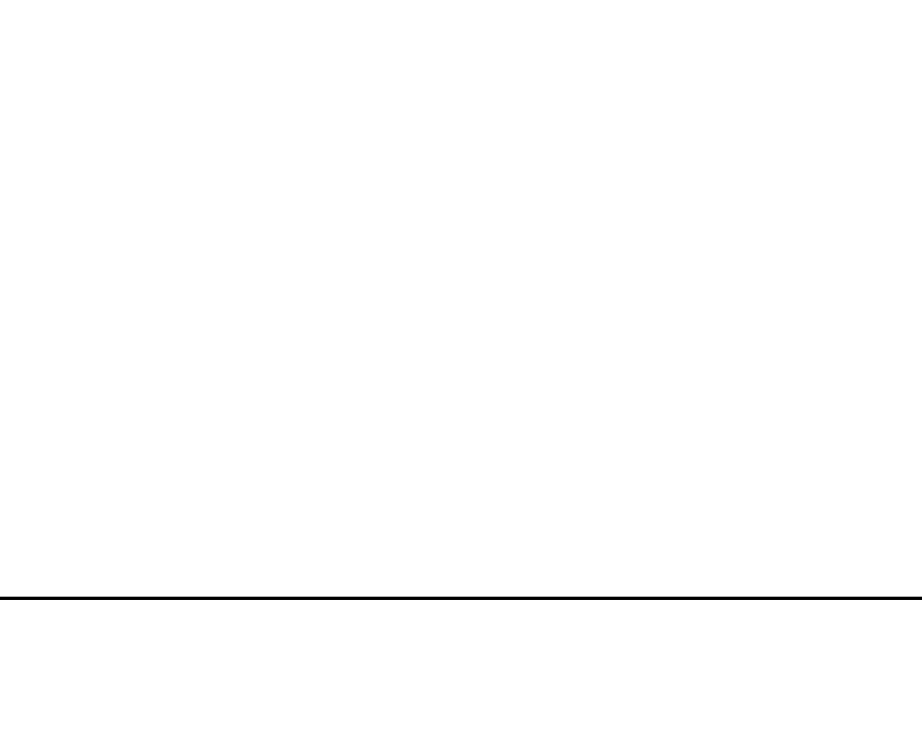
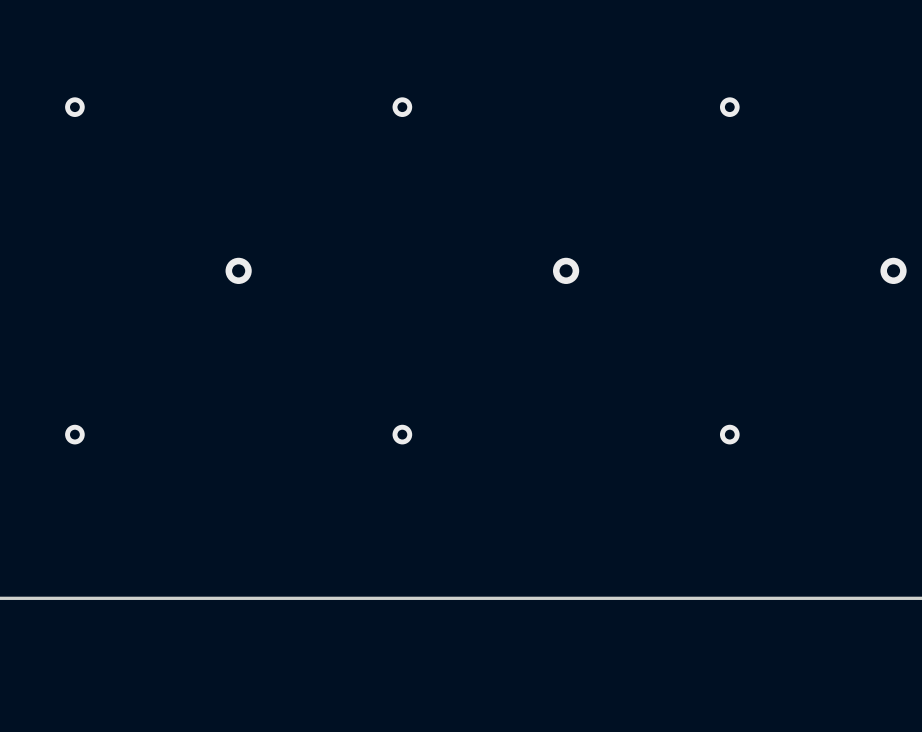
via: none -> (74, 107)
via: none -> (402, 107)
via: none -> (729, 107)
via: none -> (238, 270)
via: none -> (566, 270)
via: none -> (893, 270)
via: none -> (74, 434)
via: none -> (402, 434)
via: none -> (729, 434)

